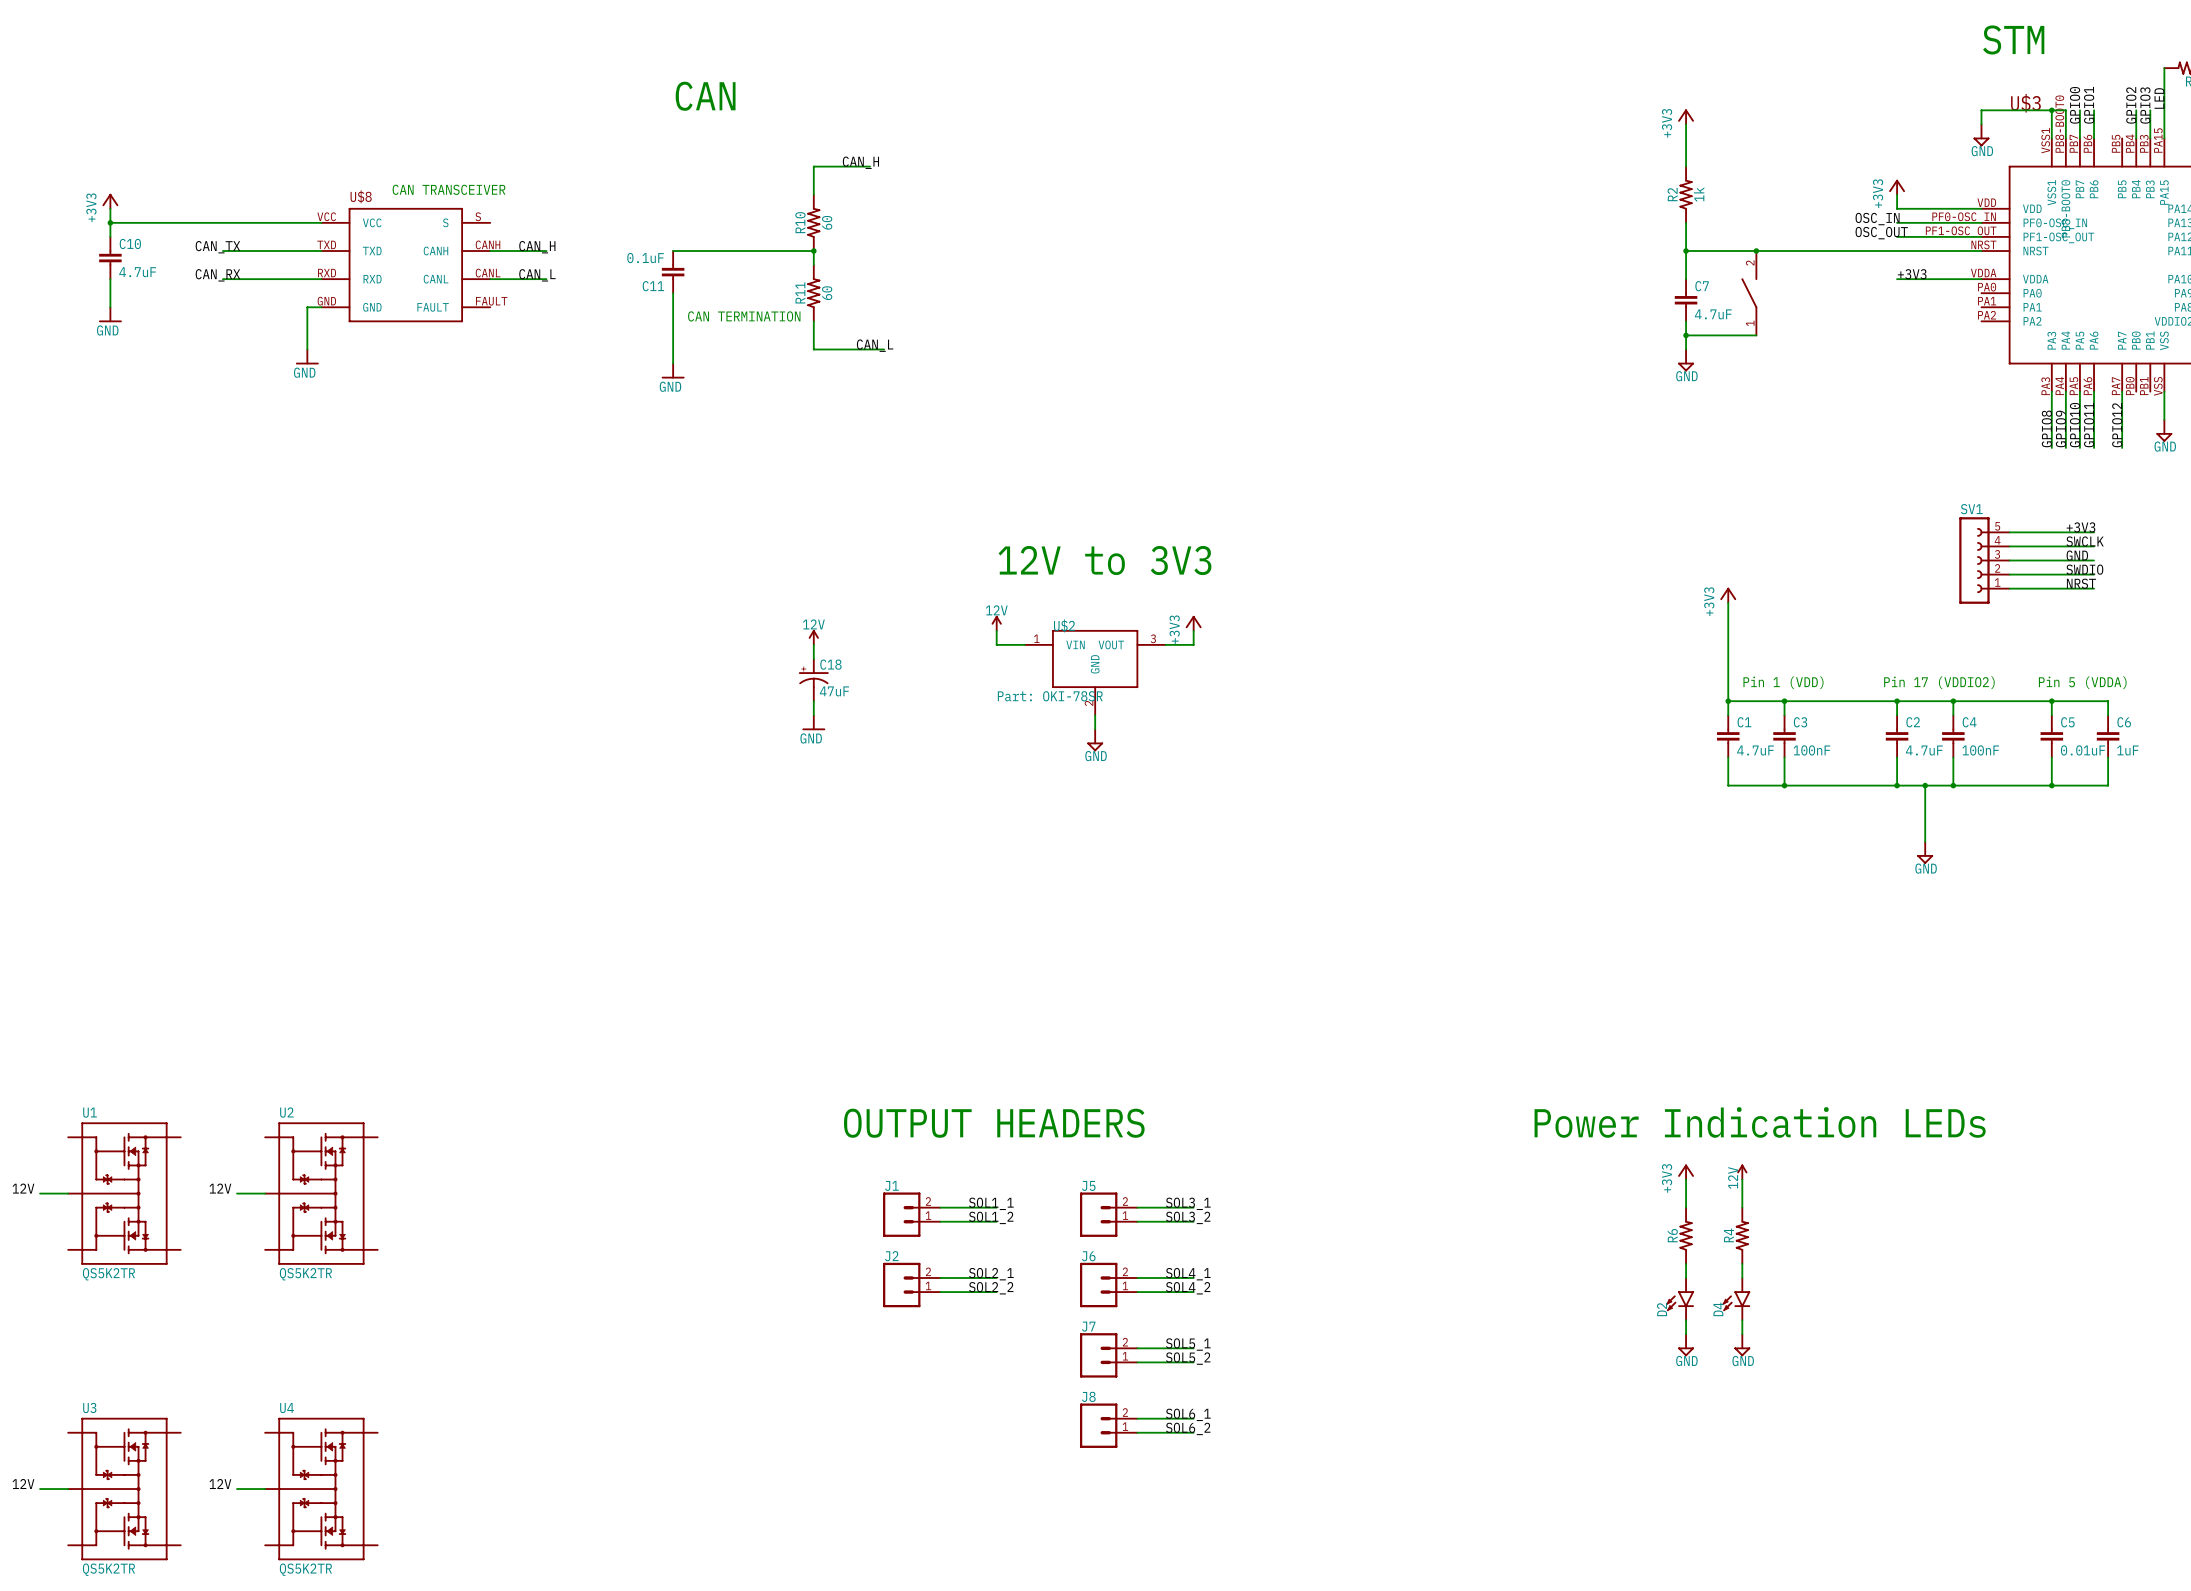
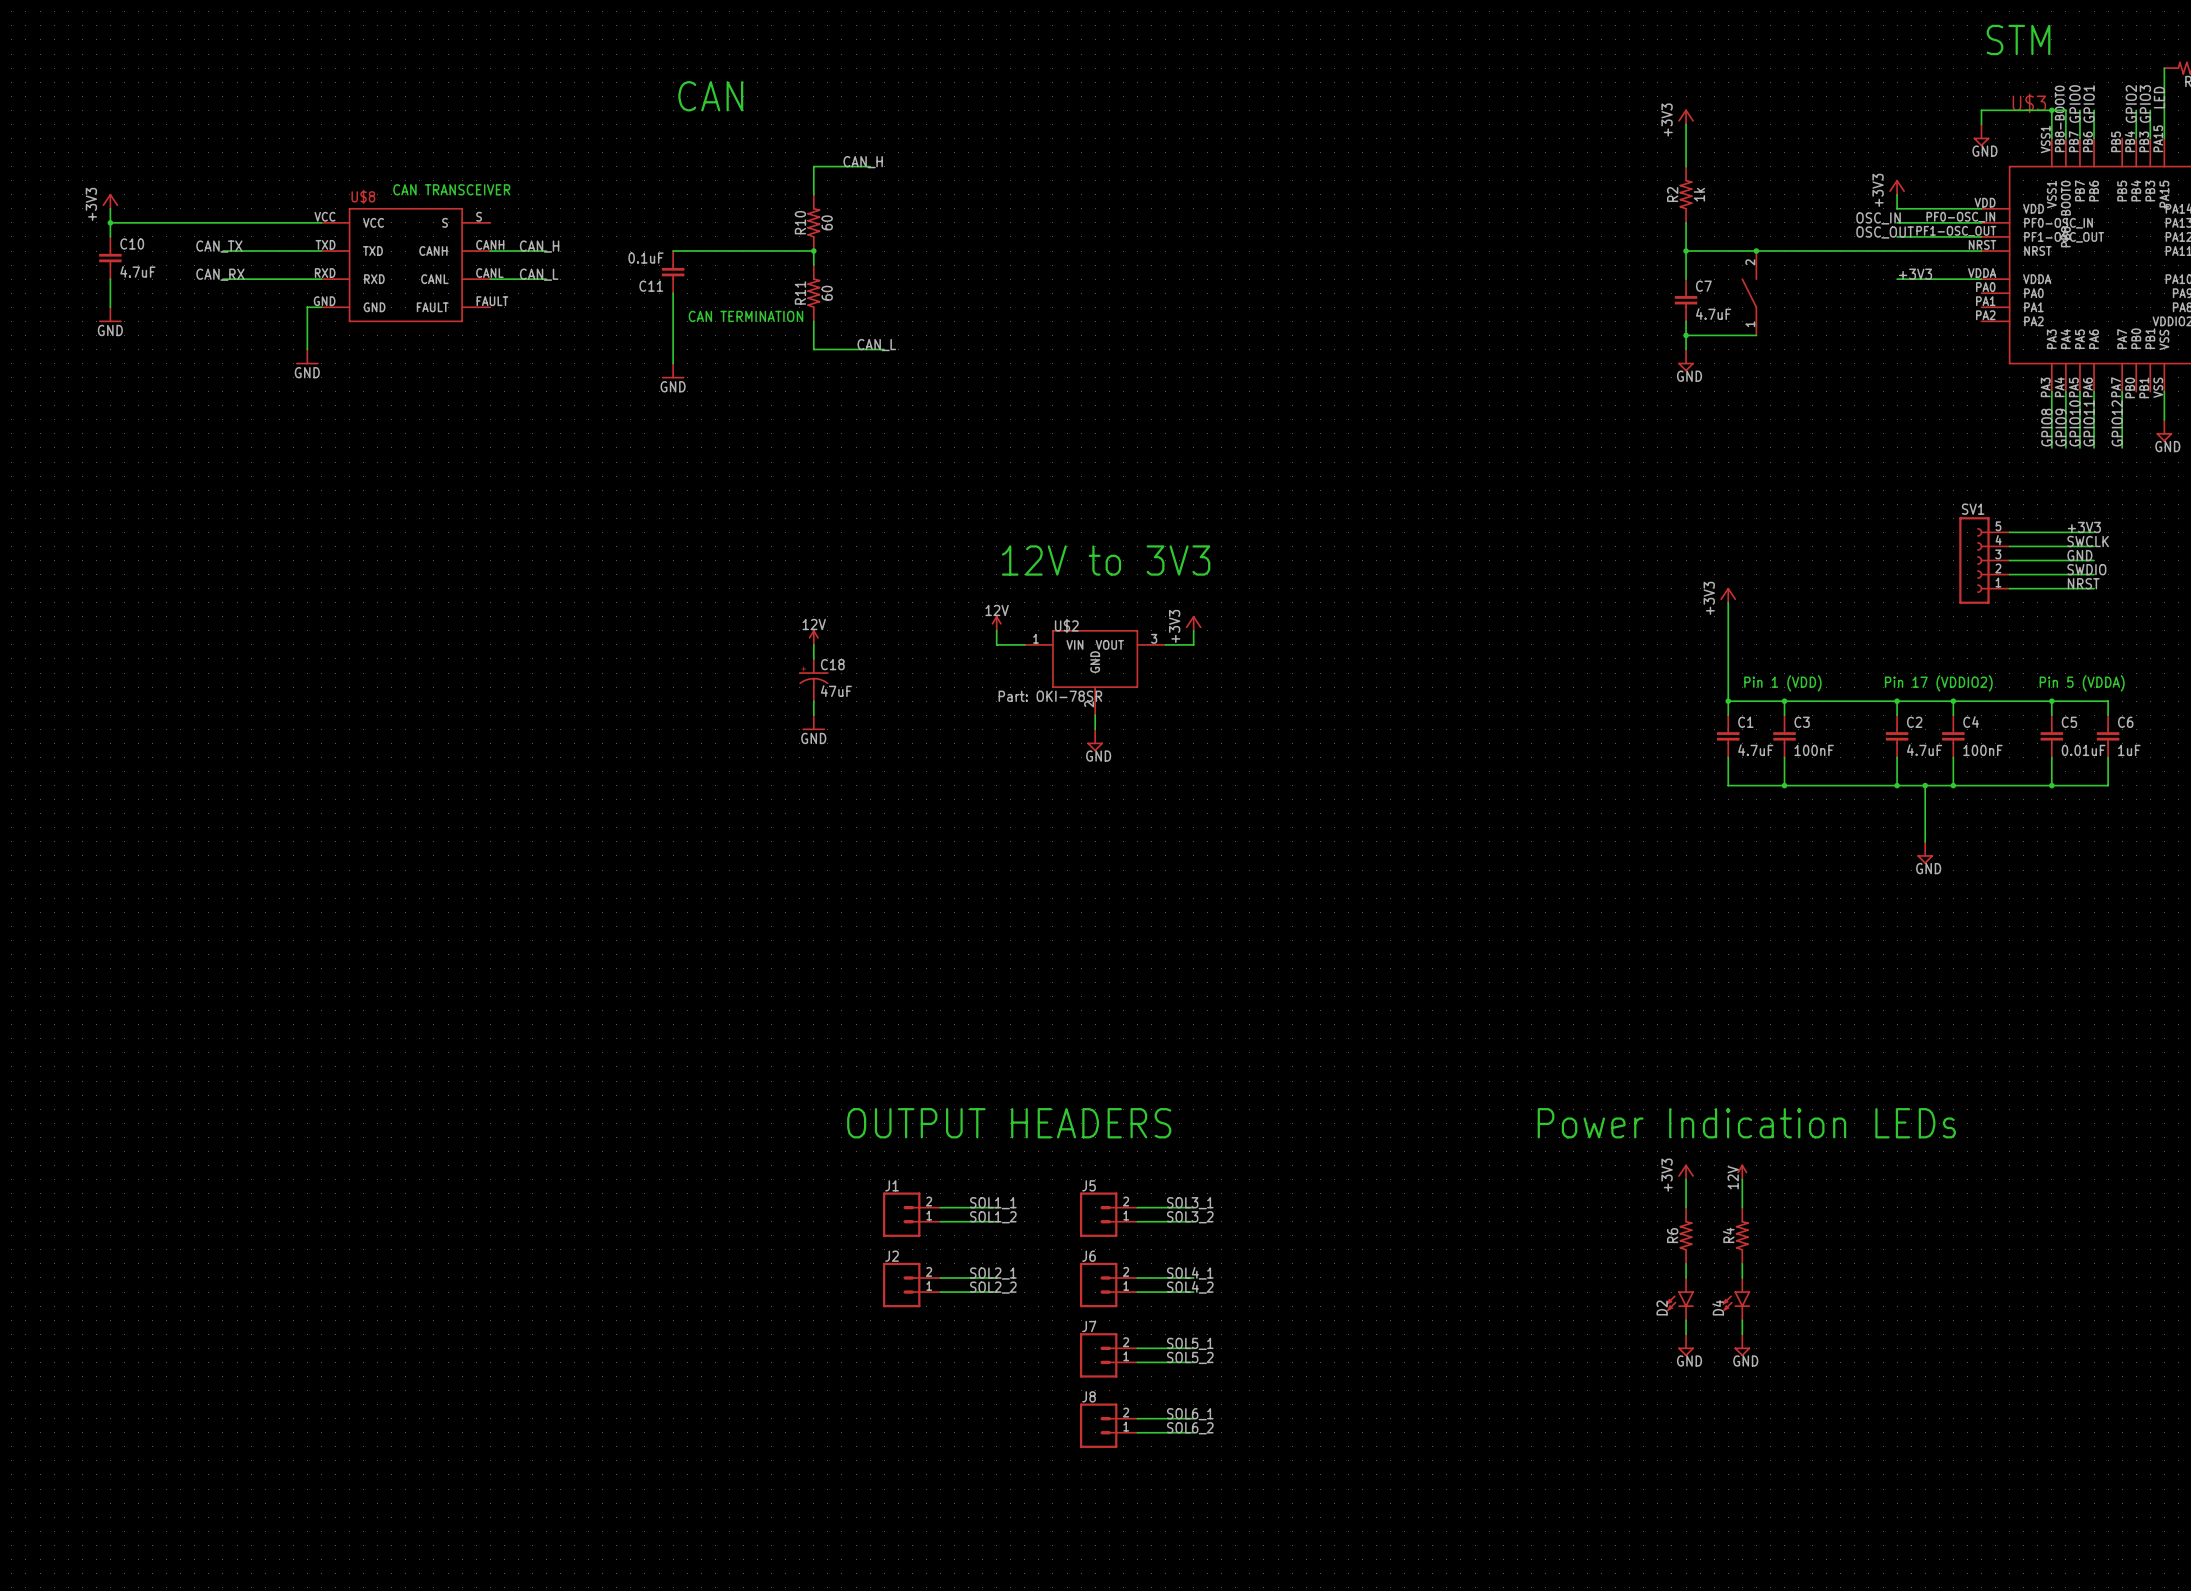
label: 12V (23, 1188) -> none
label: 12V (220, 1188) -> none
wire: (40, 1193) (68, 1193) -> none
U1: QS5K2TR (124, 1193) -> none
wire: (237, 1193) (265, 1193) -> none
U2: QS5K2TR (321, 1193) -> none
label: 12V (23, 1484) -> none
label: 12V (220, 1484) -> none
wire: (40, 1489) (68, 1489) -> none
U3: QS5K2TR (124, 1489) -> none
wire: (237, 1489) (265, 1489) -> none
U4: QS5K2TR (321, 1489) -> none

